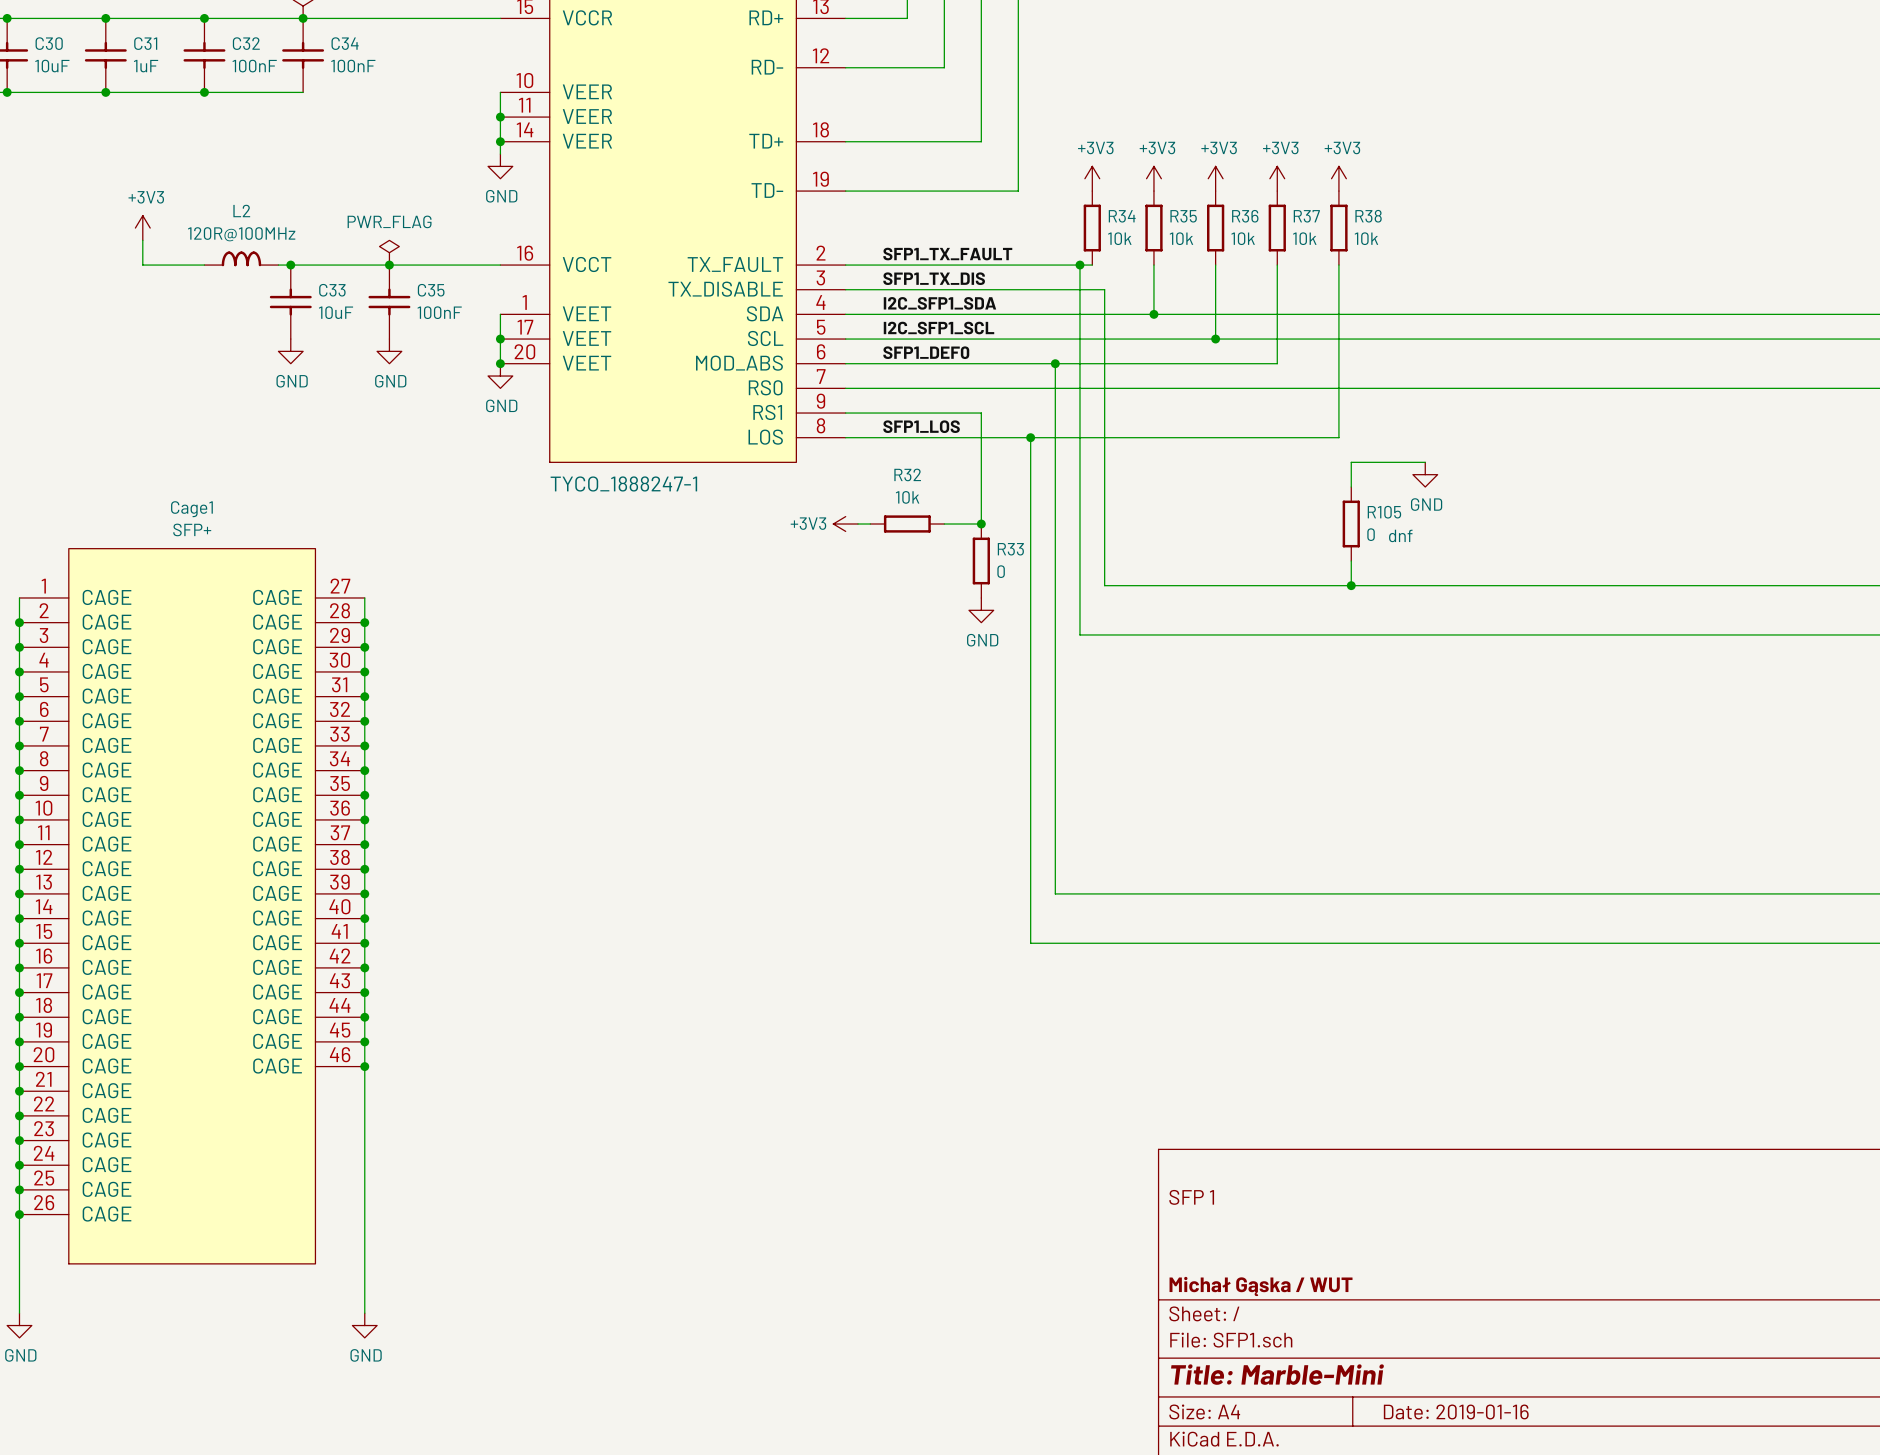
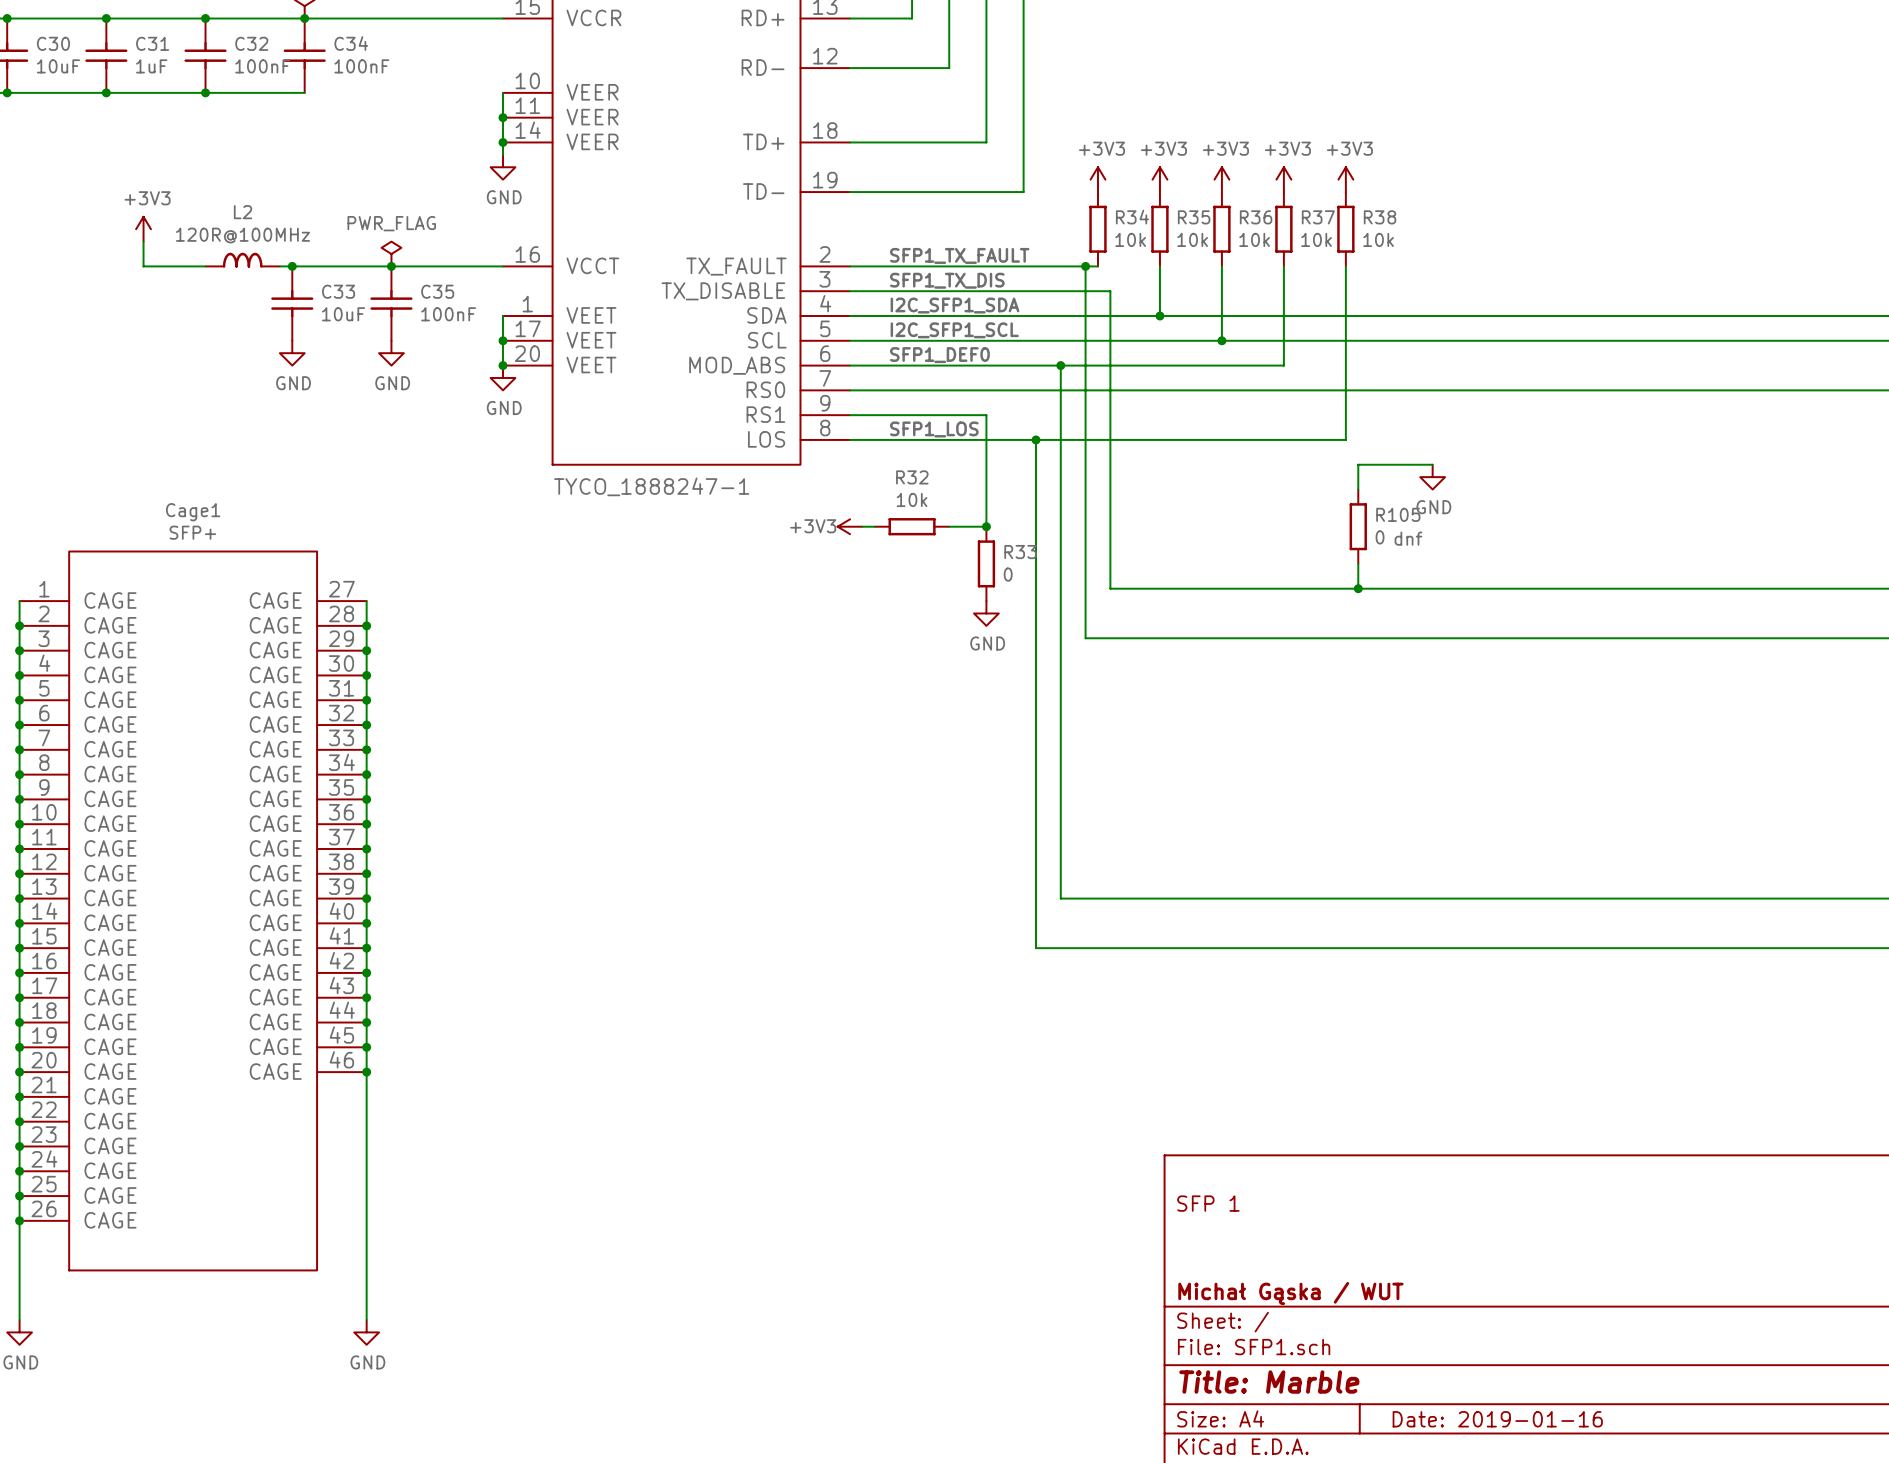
title block: Title: Marble-Mini (1277, 1374) -> Title: Marble (1269, 1382)

